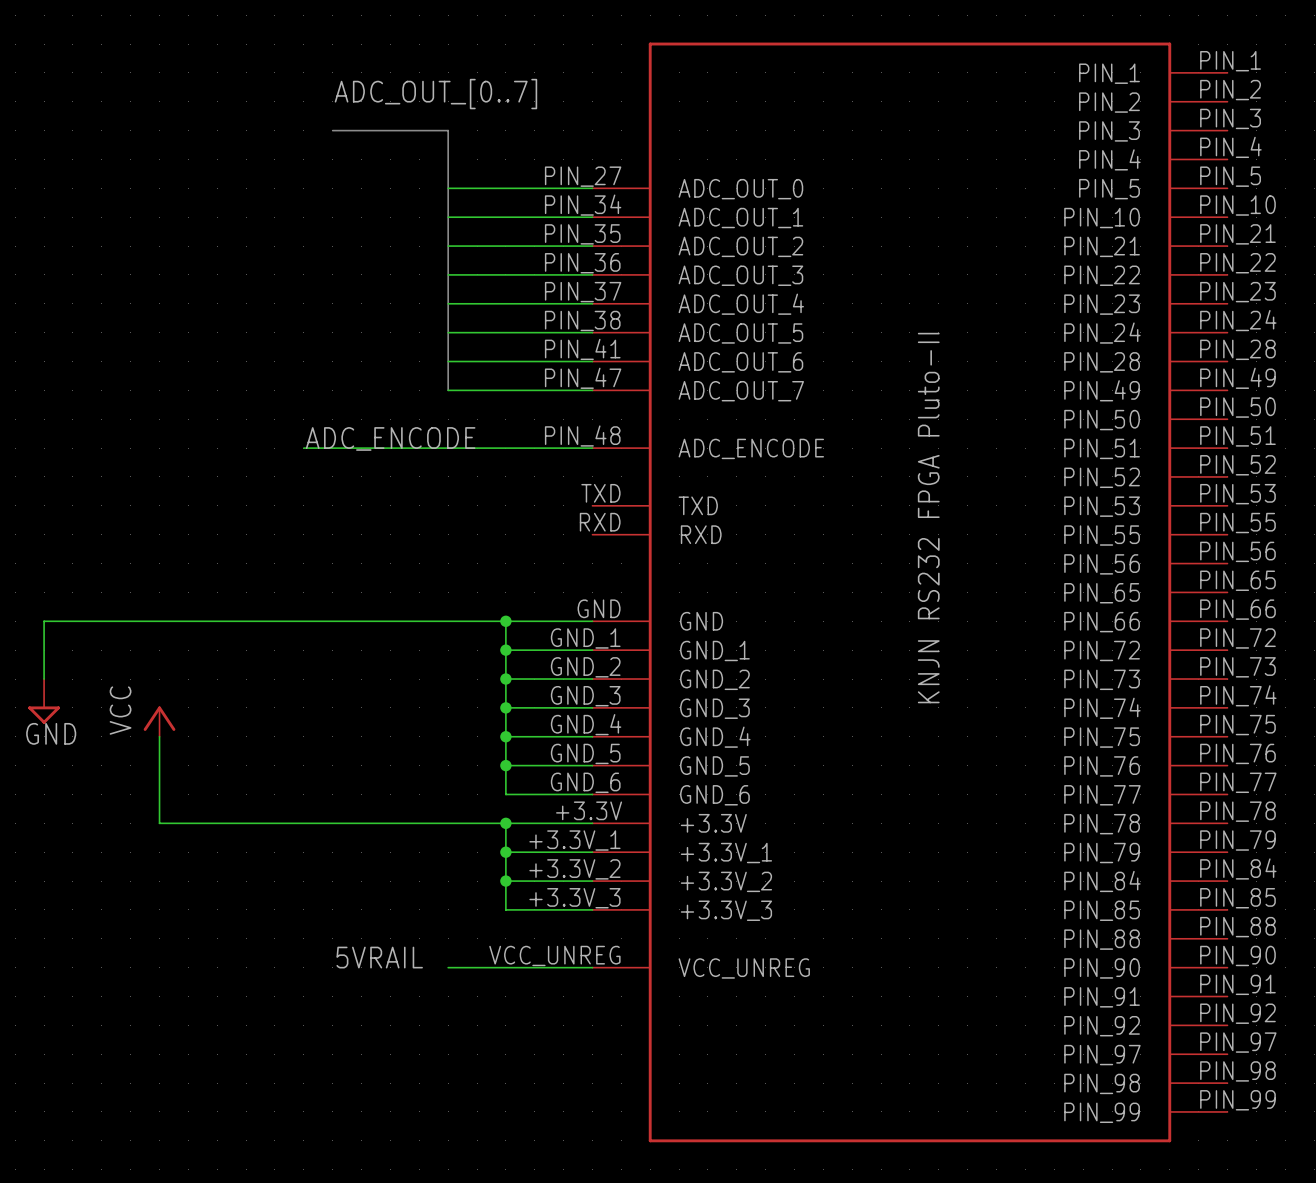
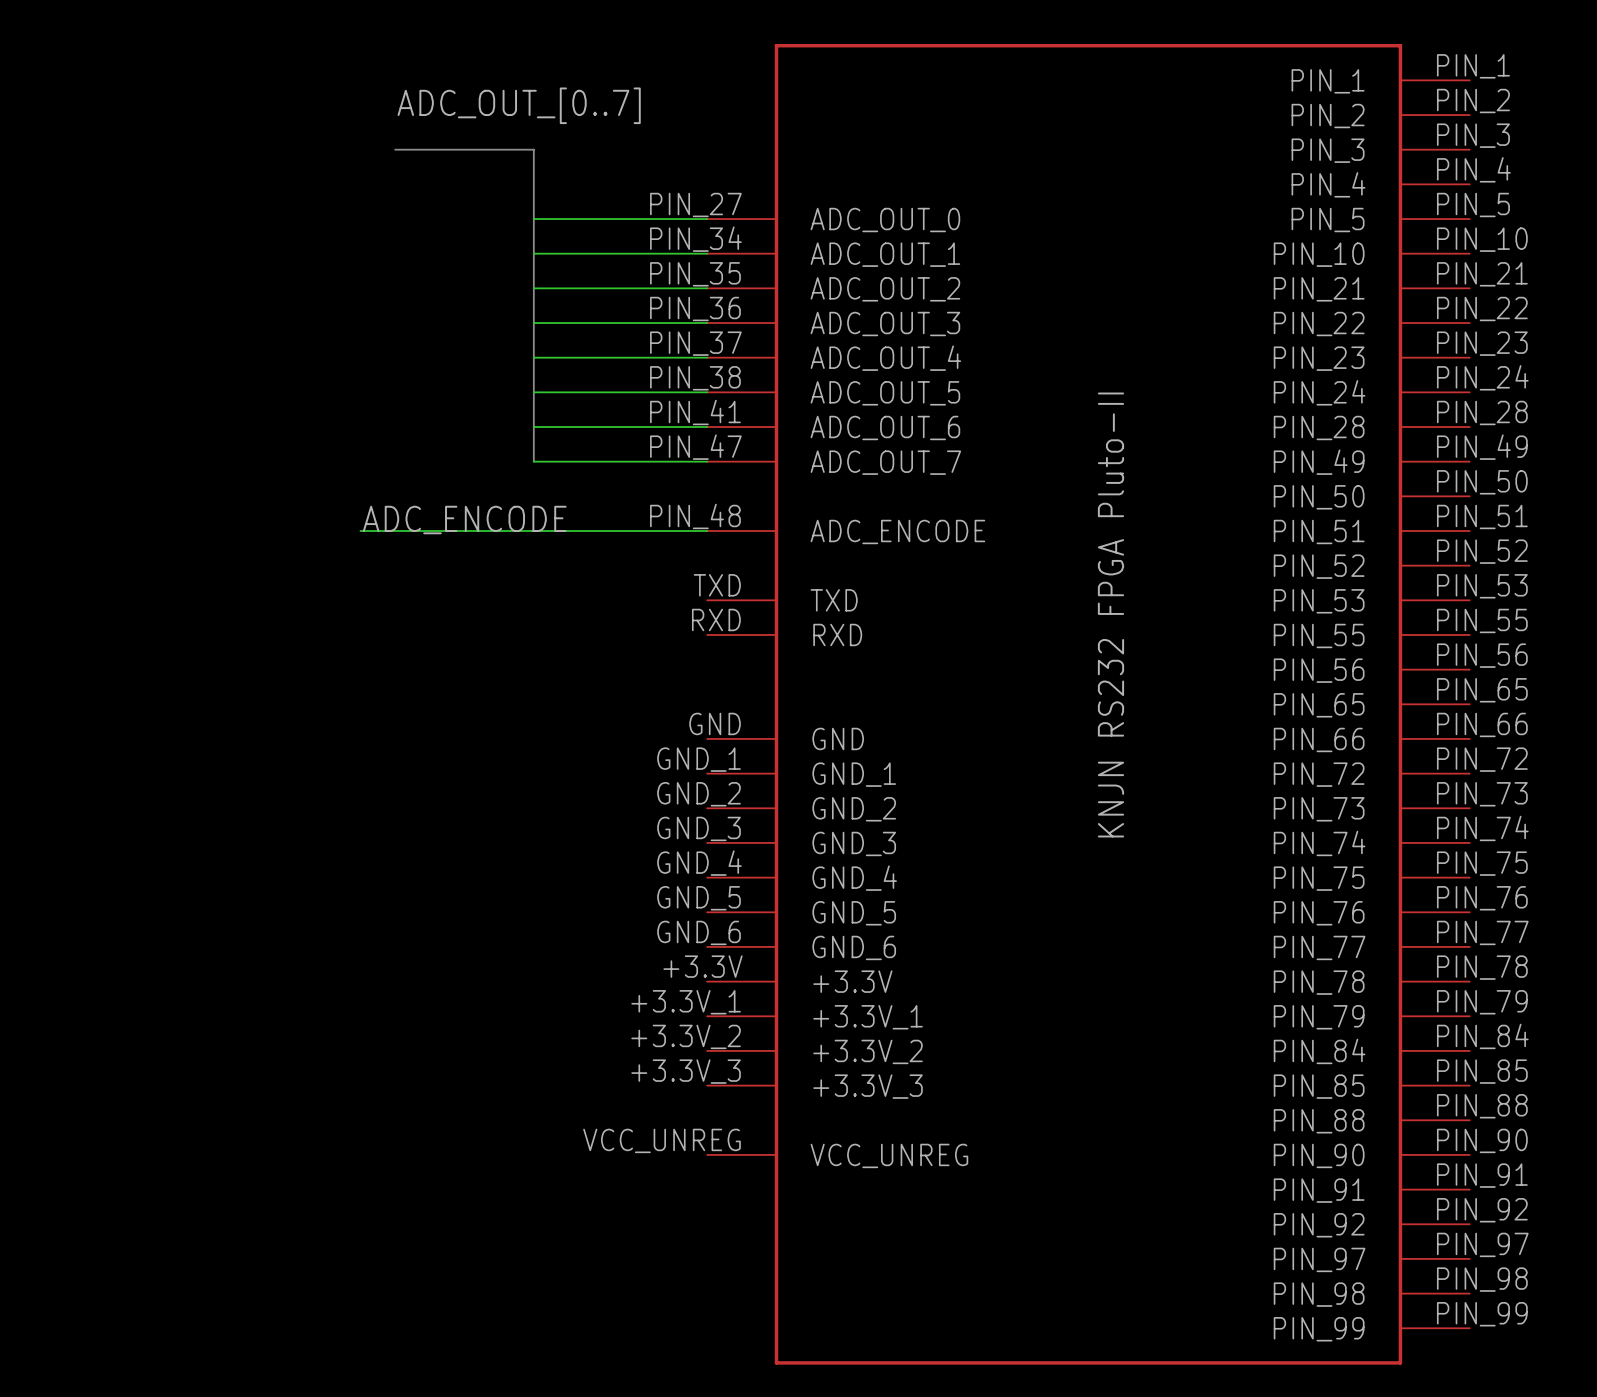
wire: (505, 621) (505, 794) (592, 794) -> none
junction: (505, 621) -> none
wire: (592, 621) (44, 621) (44, 679) -> none
wire: (505, 650) (592, 650) -> none
junction: (505, 650) -> none
wire: (505, 679) (592, 679) -> none
junction: (505, 679) -> none
power symbol: GND (44, 701) -> none
wire: (505, 707) (592, 707) -> none
junction: (505, 707) -> none
power symbol: VCC (159, 721) -> none
wire: (159, 736) (159, 823) (592, 823) -> none
wire: (505, 736) (592, 736) -> none
junction: (505, 736) -> none
wire: (505, 765) (592, 765) -> none
junction: (505, 765) -> none
wire: (505, 823) (505, 909) (592, 909) -> none
junction: (505, 823) -> none
wire: (505, 852) (592, 852) -> none
junction: (505, 852) -> none
wire: (505, 881) (592, 881) -> none
junction: (505, 881) -> none
label: 5VRAIL (379, 957) -> none
wire: (448, 967) (592, 967) -> none

